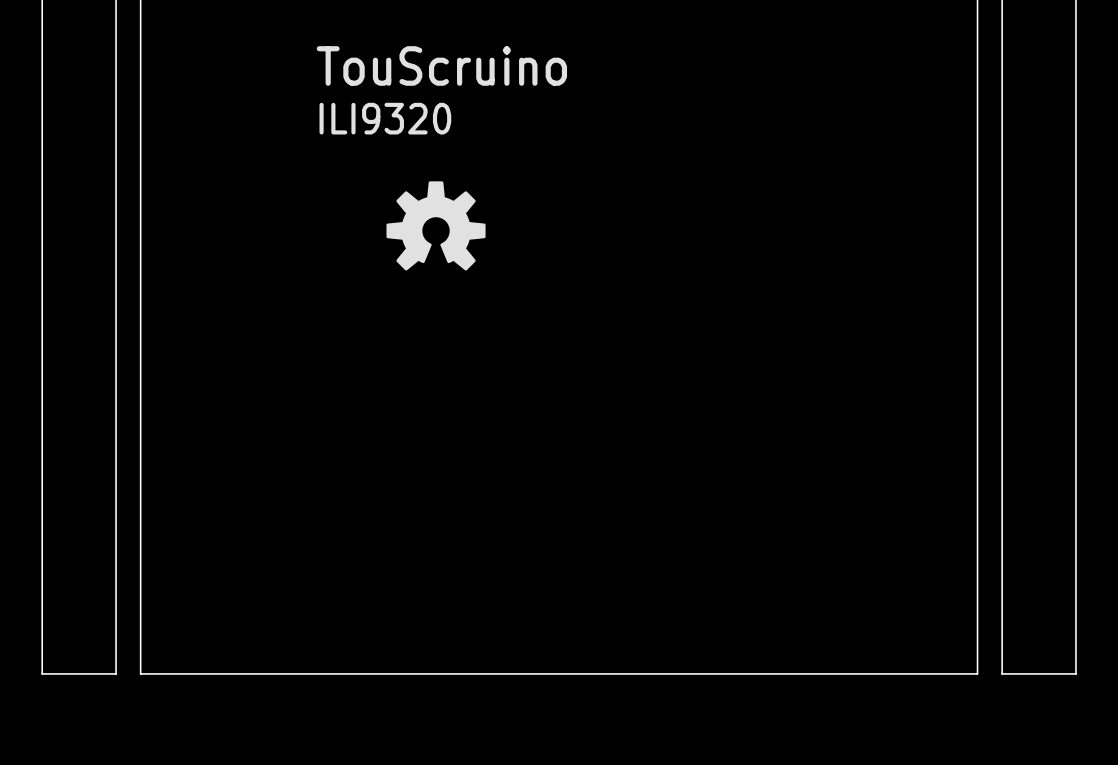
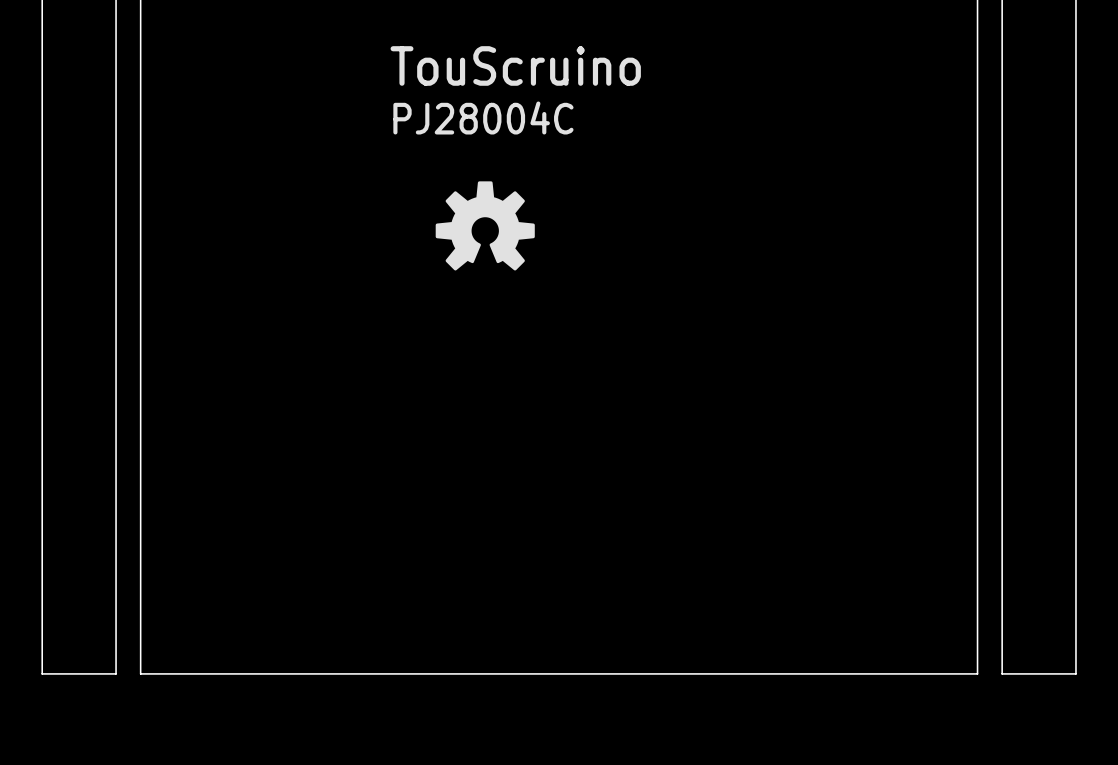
text position: TouScruino (441, 65) -> TouScruino (515, 65)
text: none -> PJ28004C (483, 117)
text: ILI9320 (385, 118) -> none
drawing position: (436, 225) -> (485, 225)

